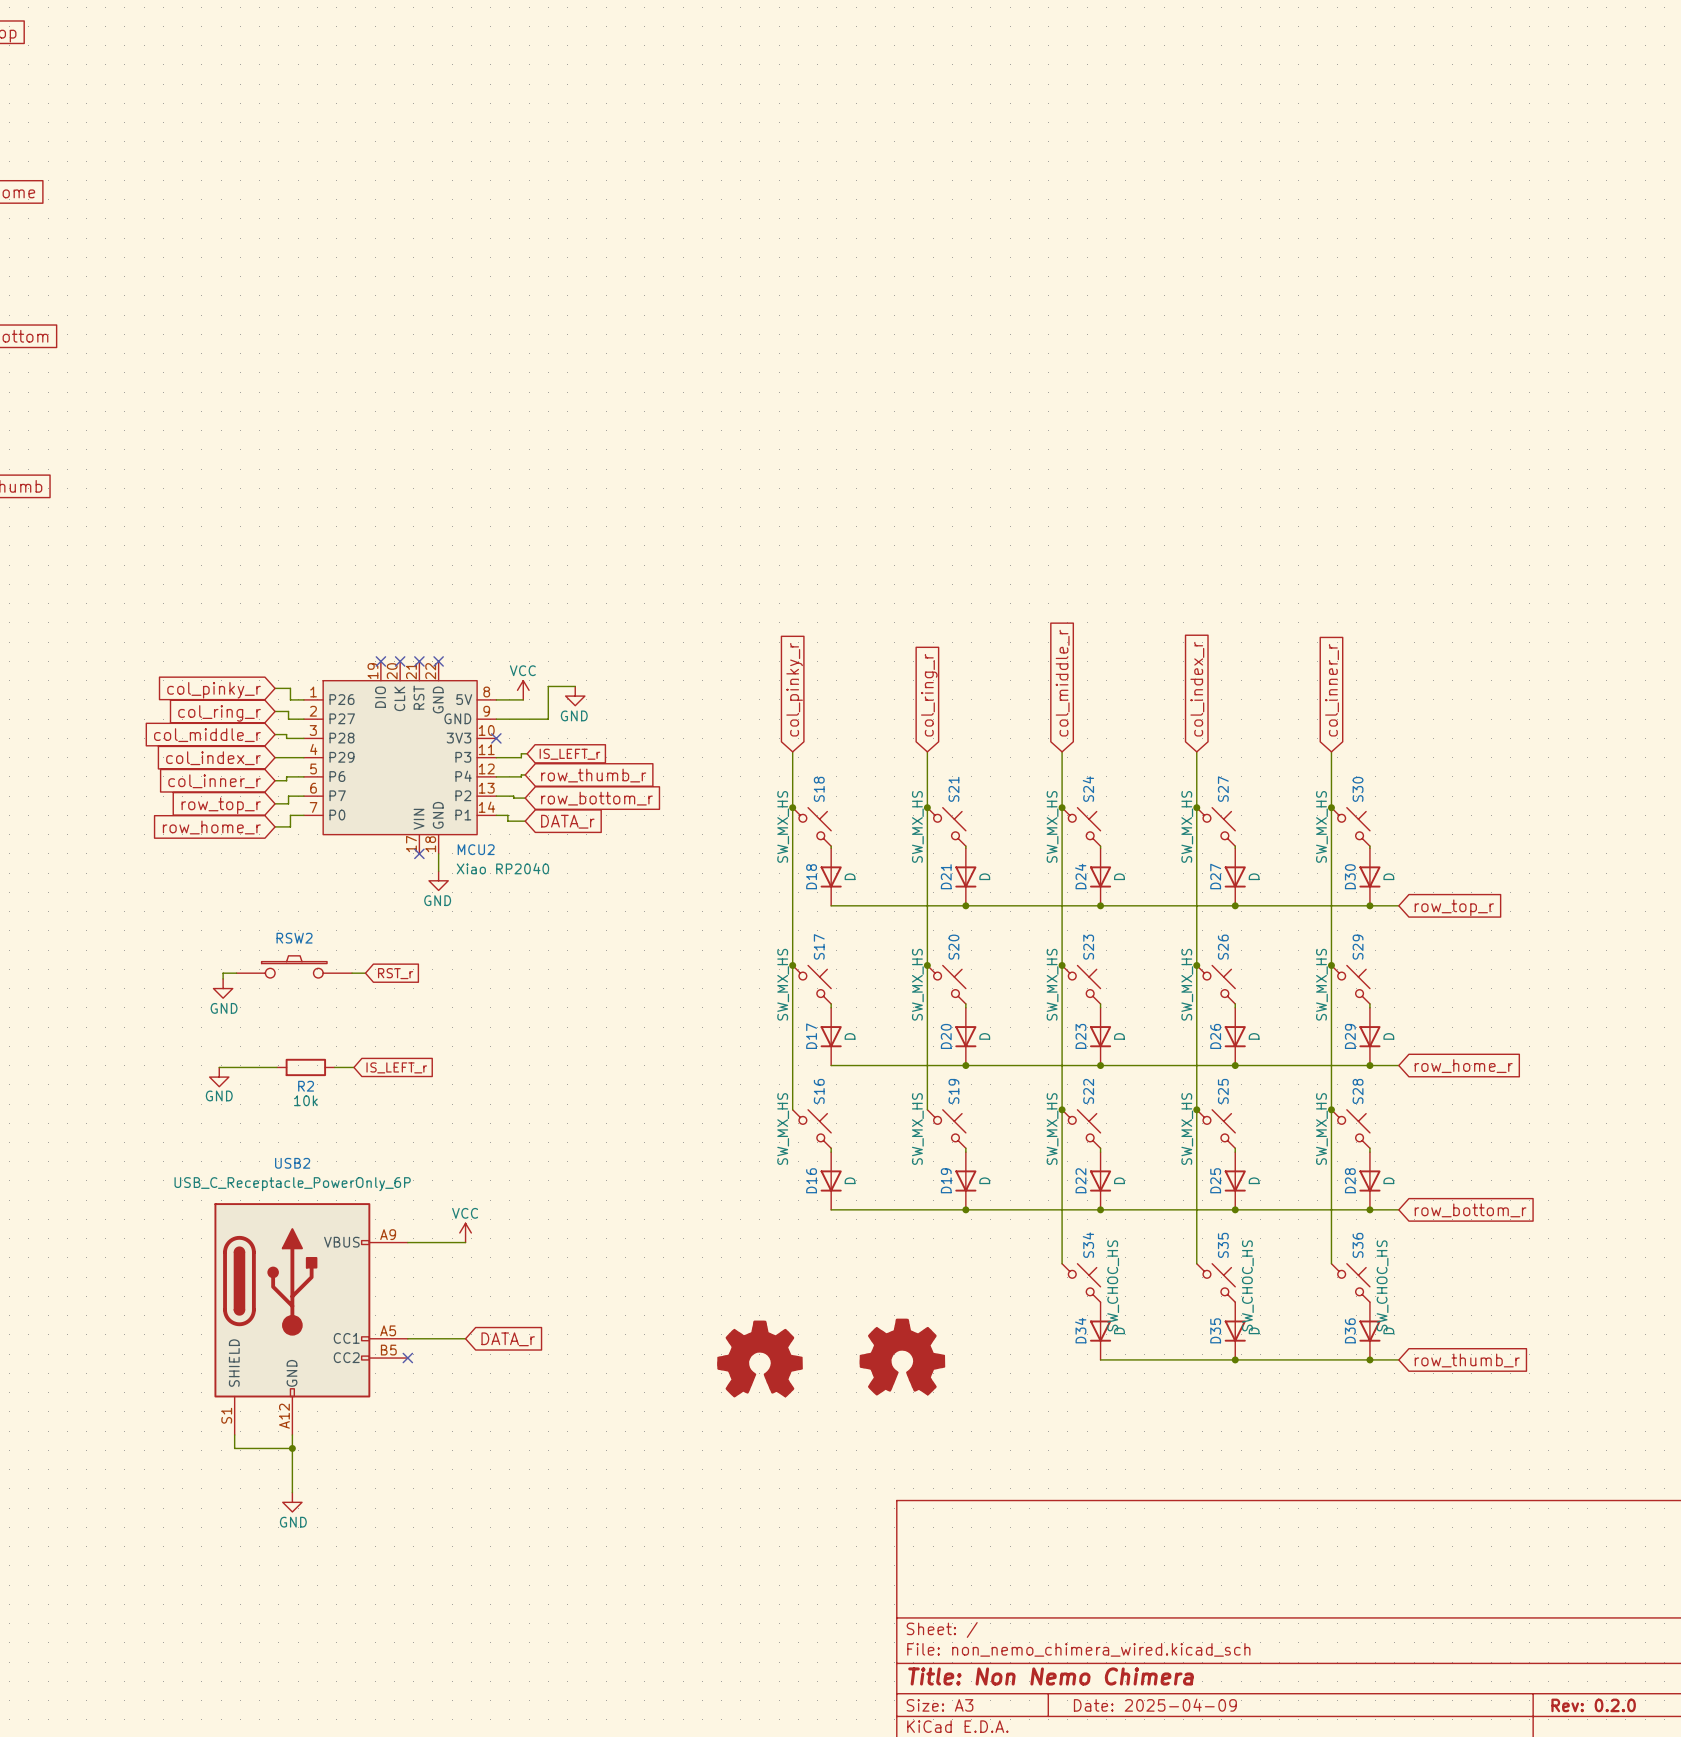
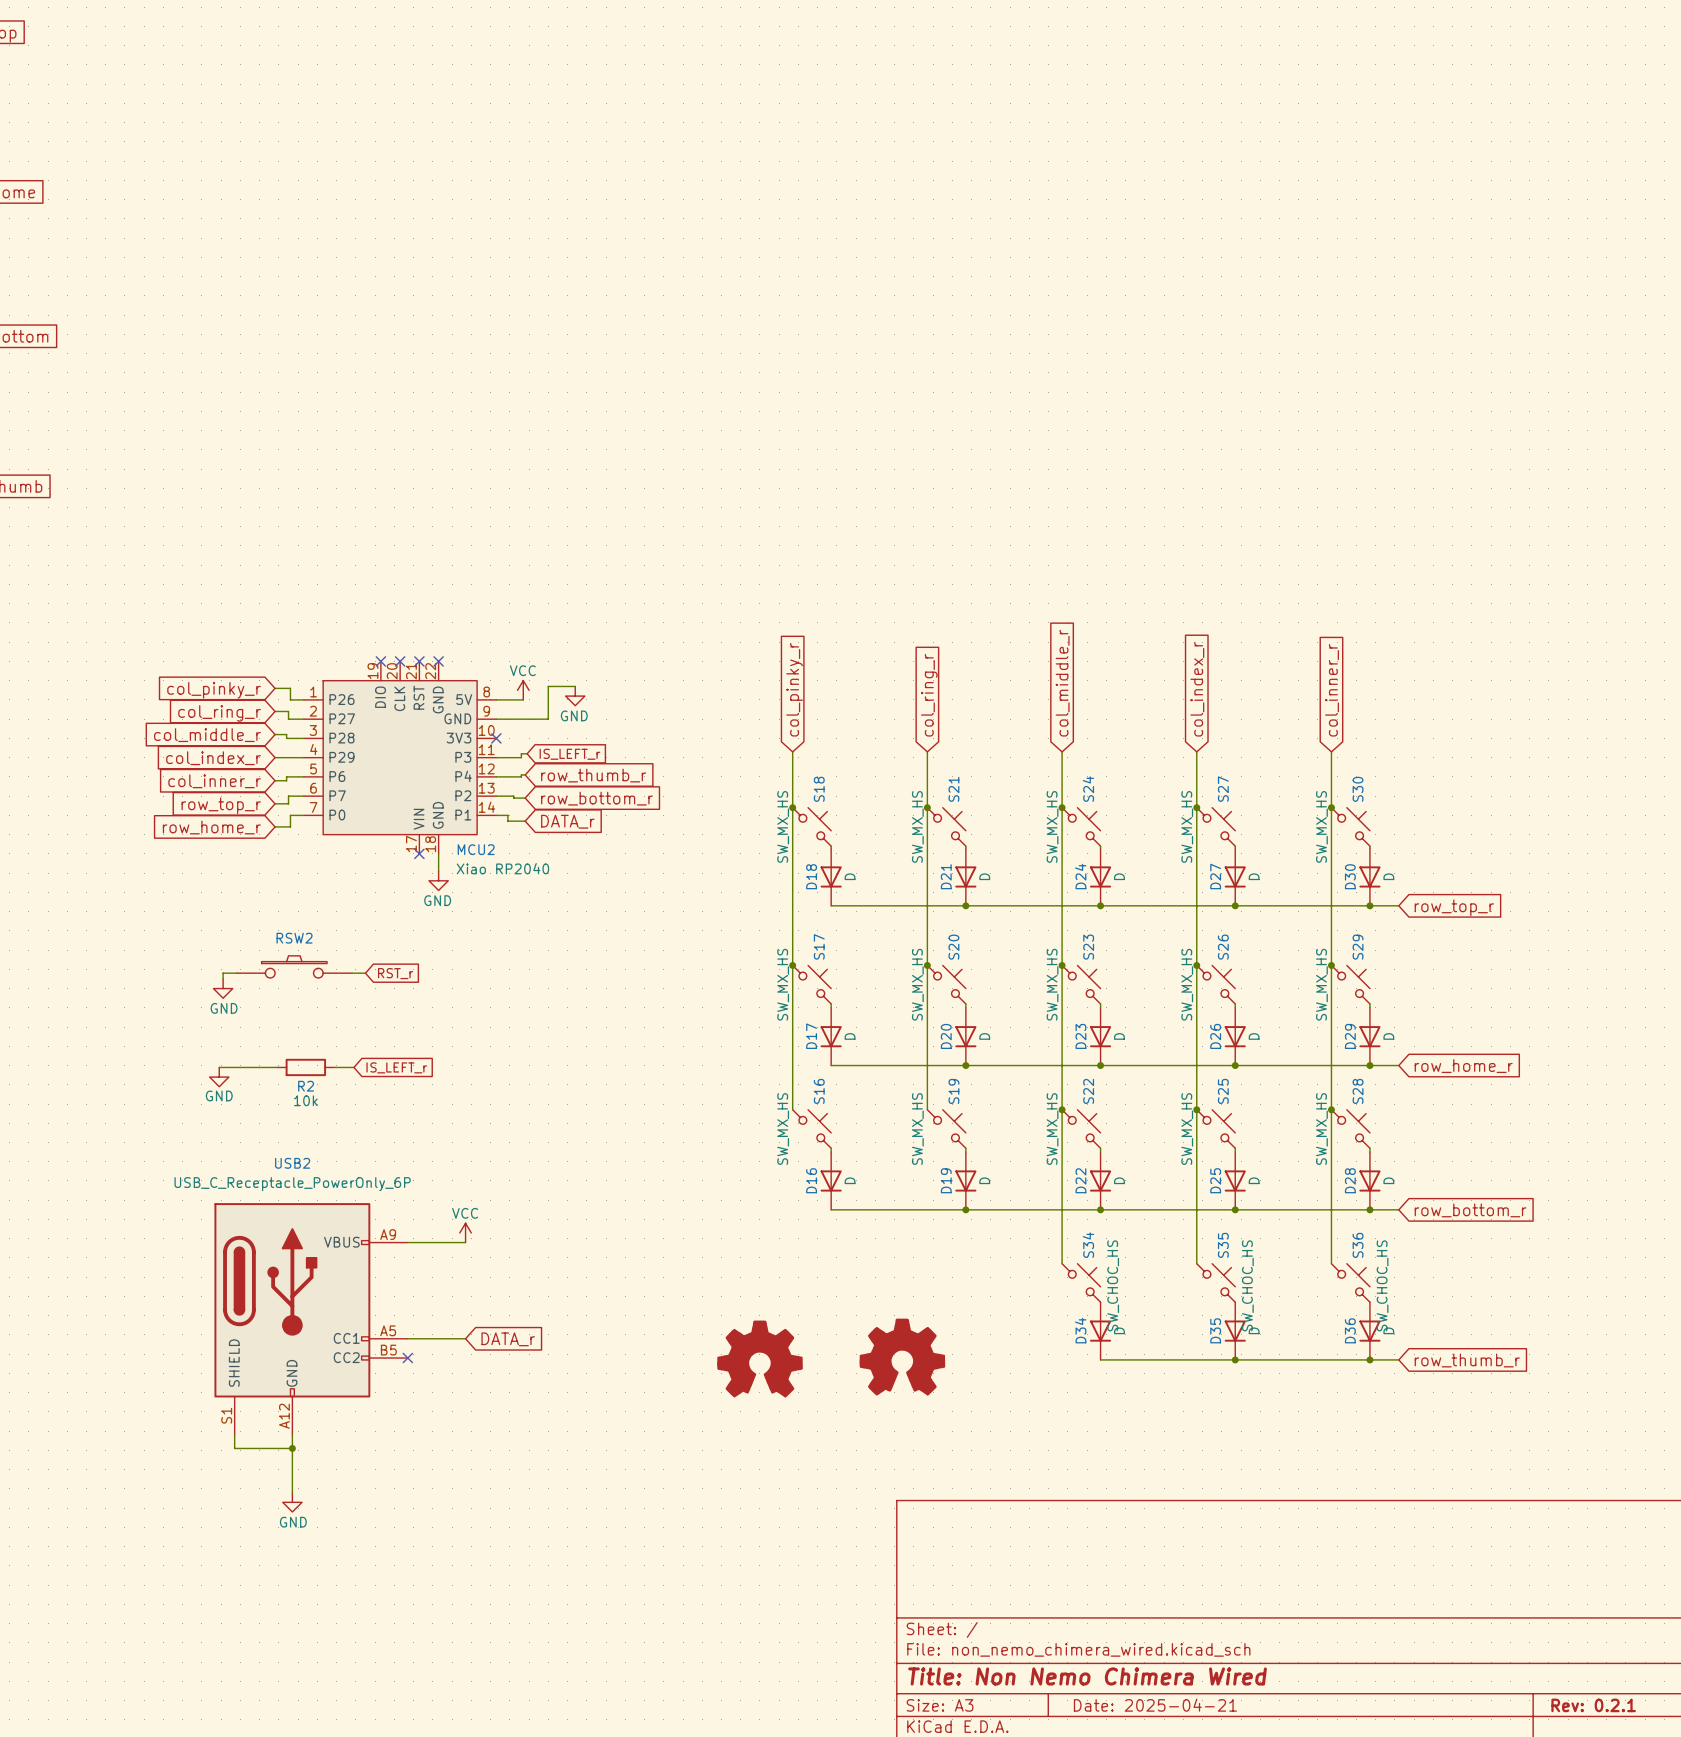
title block: Title: Non Nemo Chimera (1051, 1676) -> Title: Non Nemo Chimera Wired (1087, 1676)
title block: Date: 2025-04-09 (1155, 1705) -> Date: 2025-04-21 (1155, 1705)
title block: Rev: 0.2.0 (1593, 1705) -> Rev: 0.2.1 (1593, 1705)

